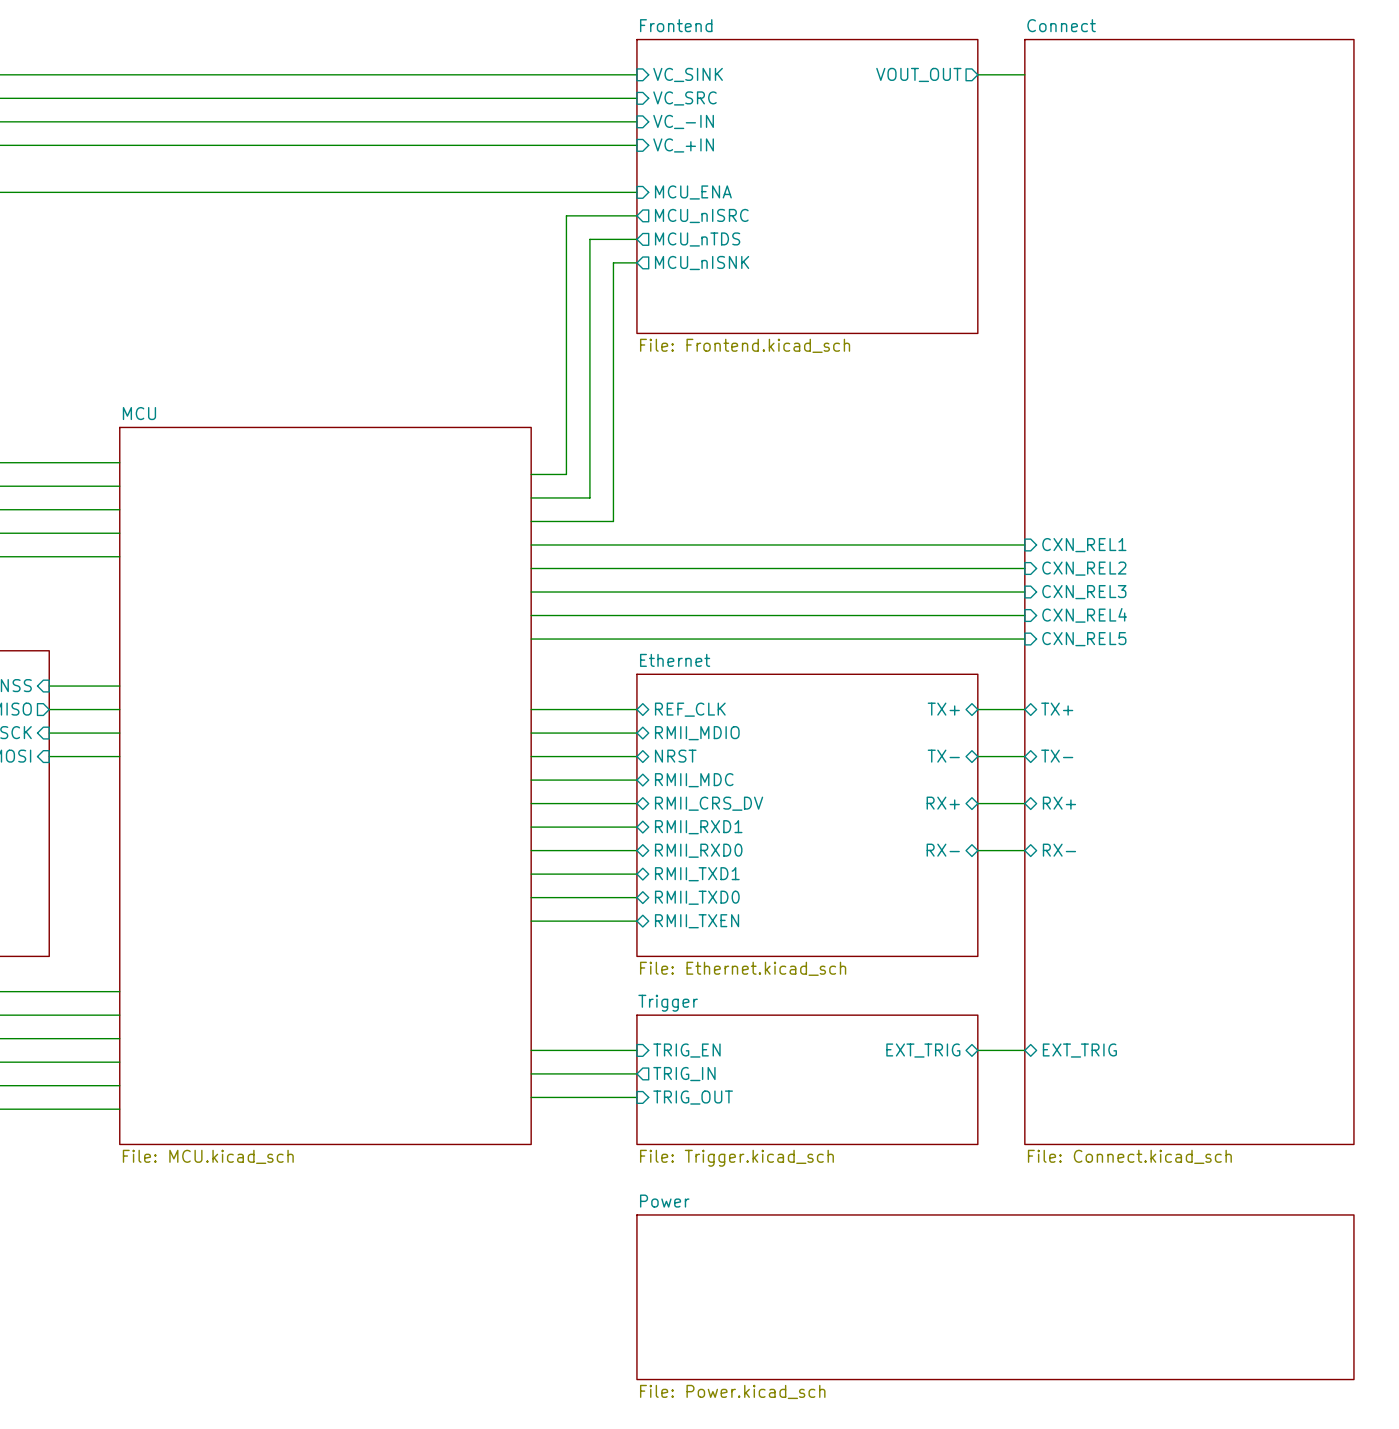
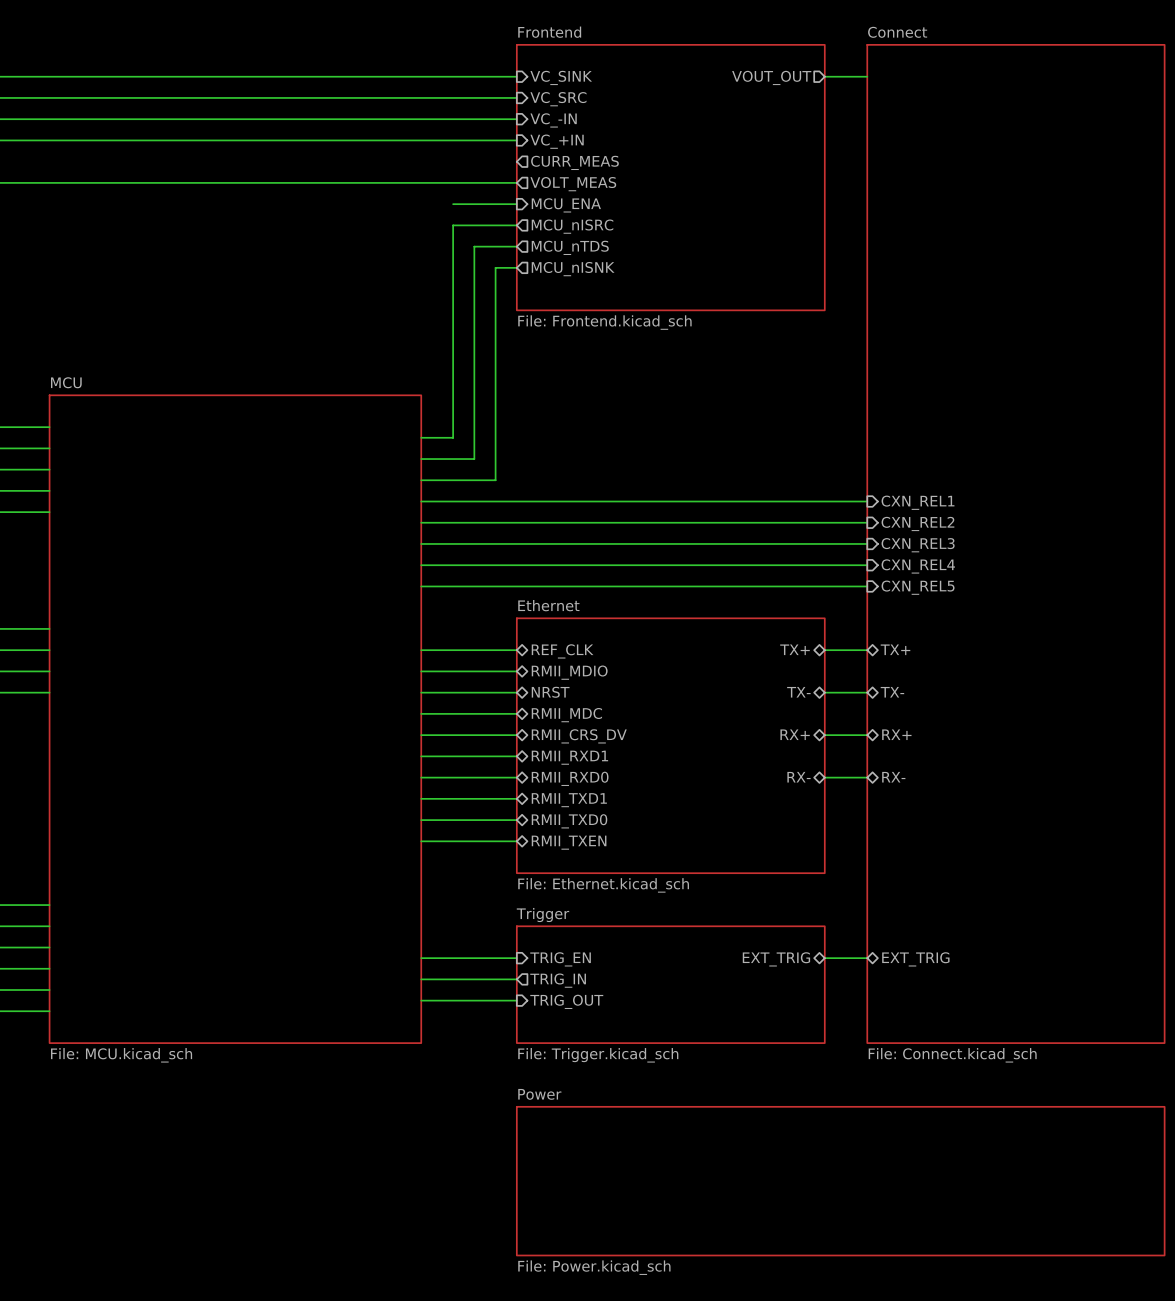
sheet pin: none -> CURR_MEAS (574, 162)
sheet pin shape: input (693, 192) -> output (573, 184)
sheet pin: MCU_ENA (693, 192) -> VOLT_MEAS (573, 184)
wire: (566, 215) (566, 239) -> (474, 225) (453, 225)
sheet pin shape: output (701, 215) -> input (566, 205)
sheet pin: MCU_nISRC (701, 215) -> MCU_ENA (566, 205)
wire: (589, 239) (589, 262) -> (495, 246) (474, 246)
sheet pin: MCU_nTDS (697, 239) -> MCU_nISRC (572, 226)
wire: (613, 262) (613, 286) -> (516, 267) (495, 267)
sheet pin: MCU_nISNK (702, 263) -> MCU_nTDS (570, 247)
sheet pin: none -> MCU_nISNK (573, 269)

